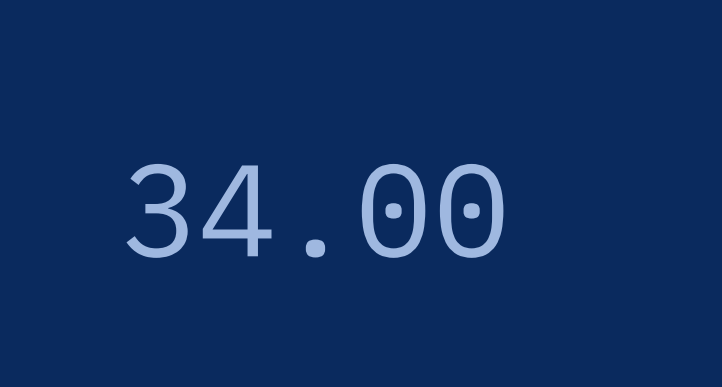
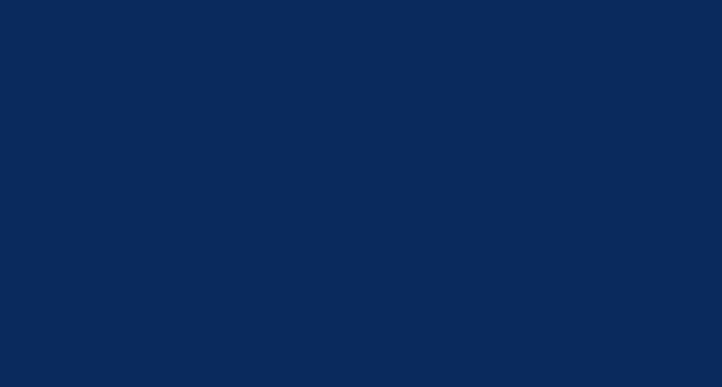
text: 34.00 (314, 210) -> none

